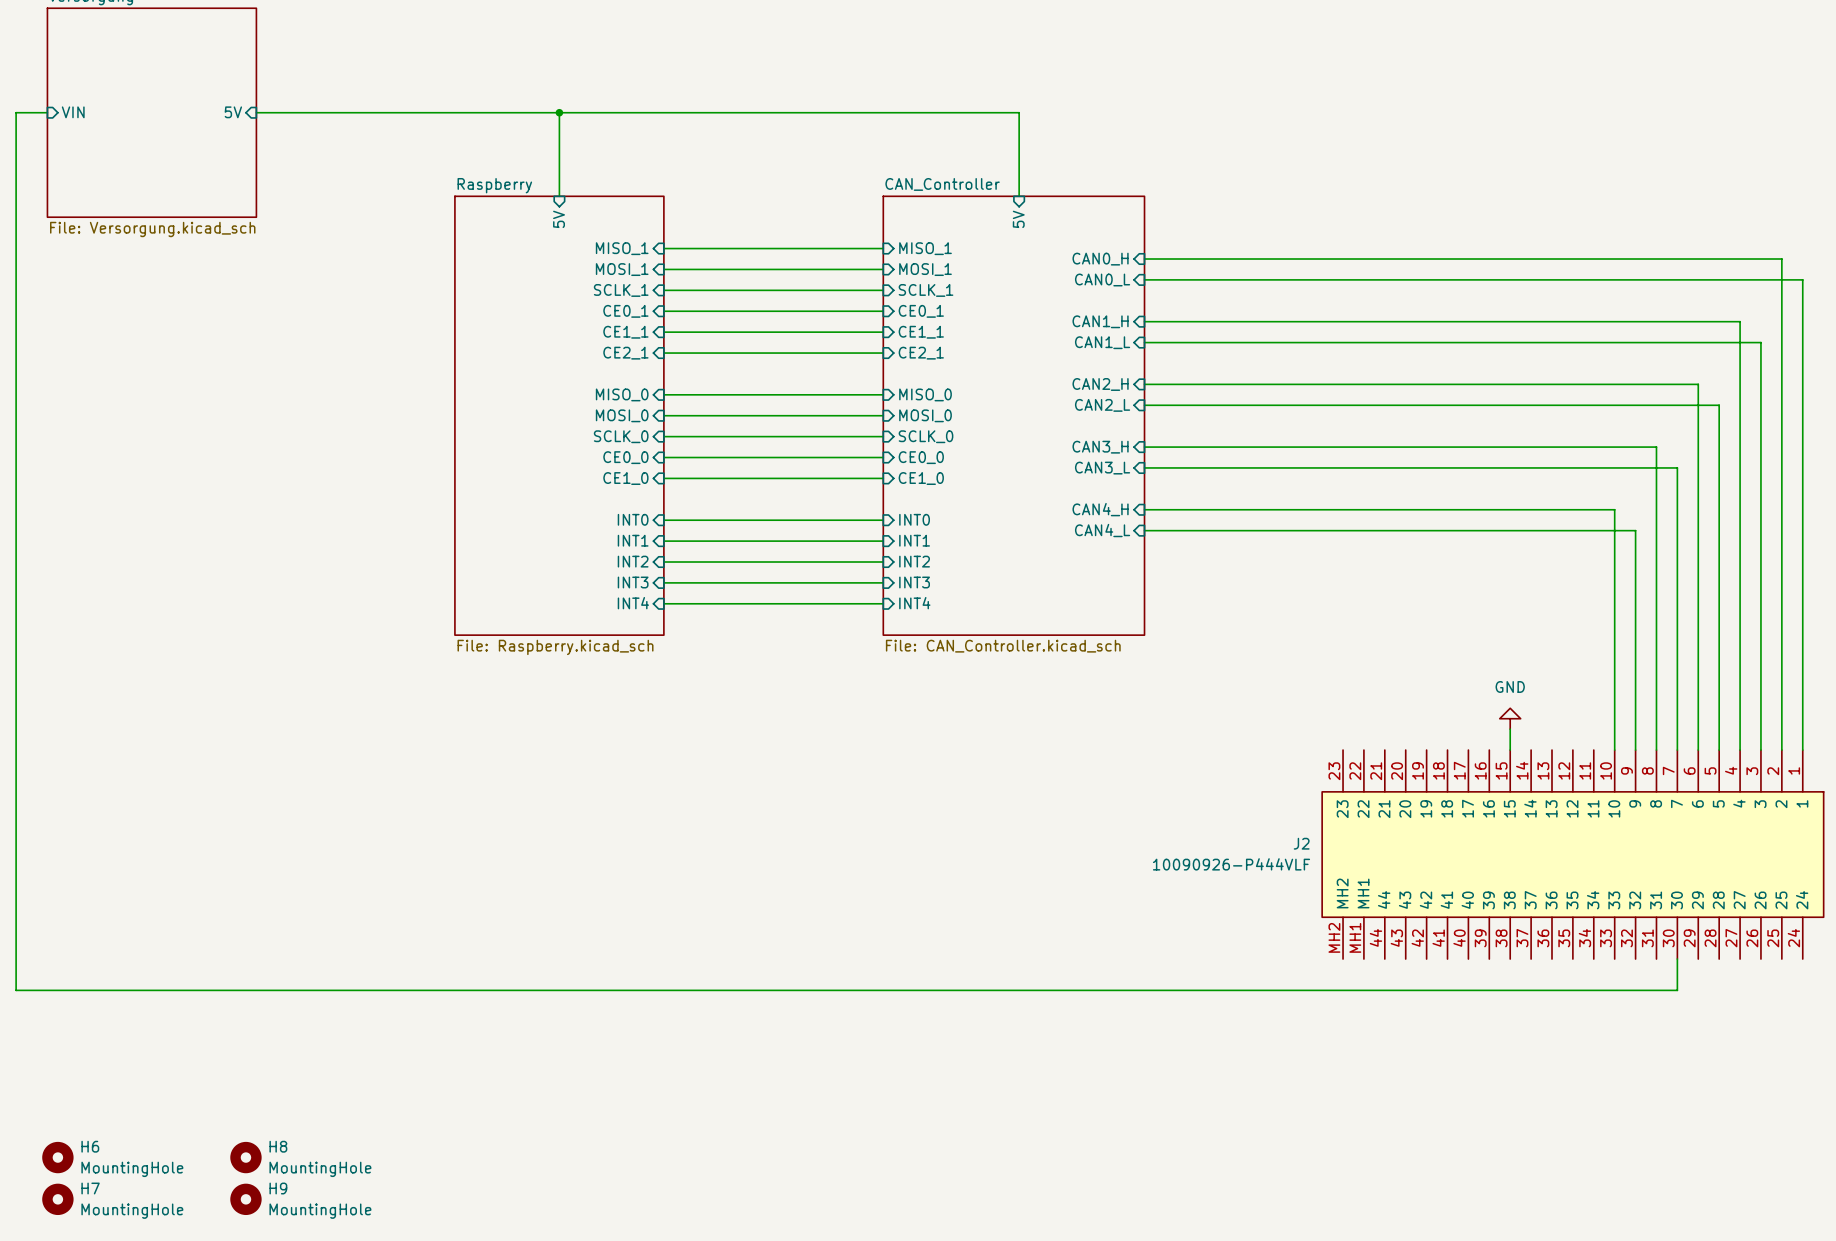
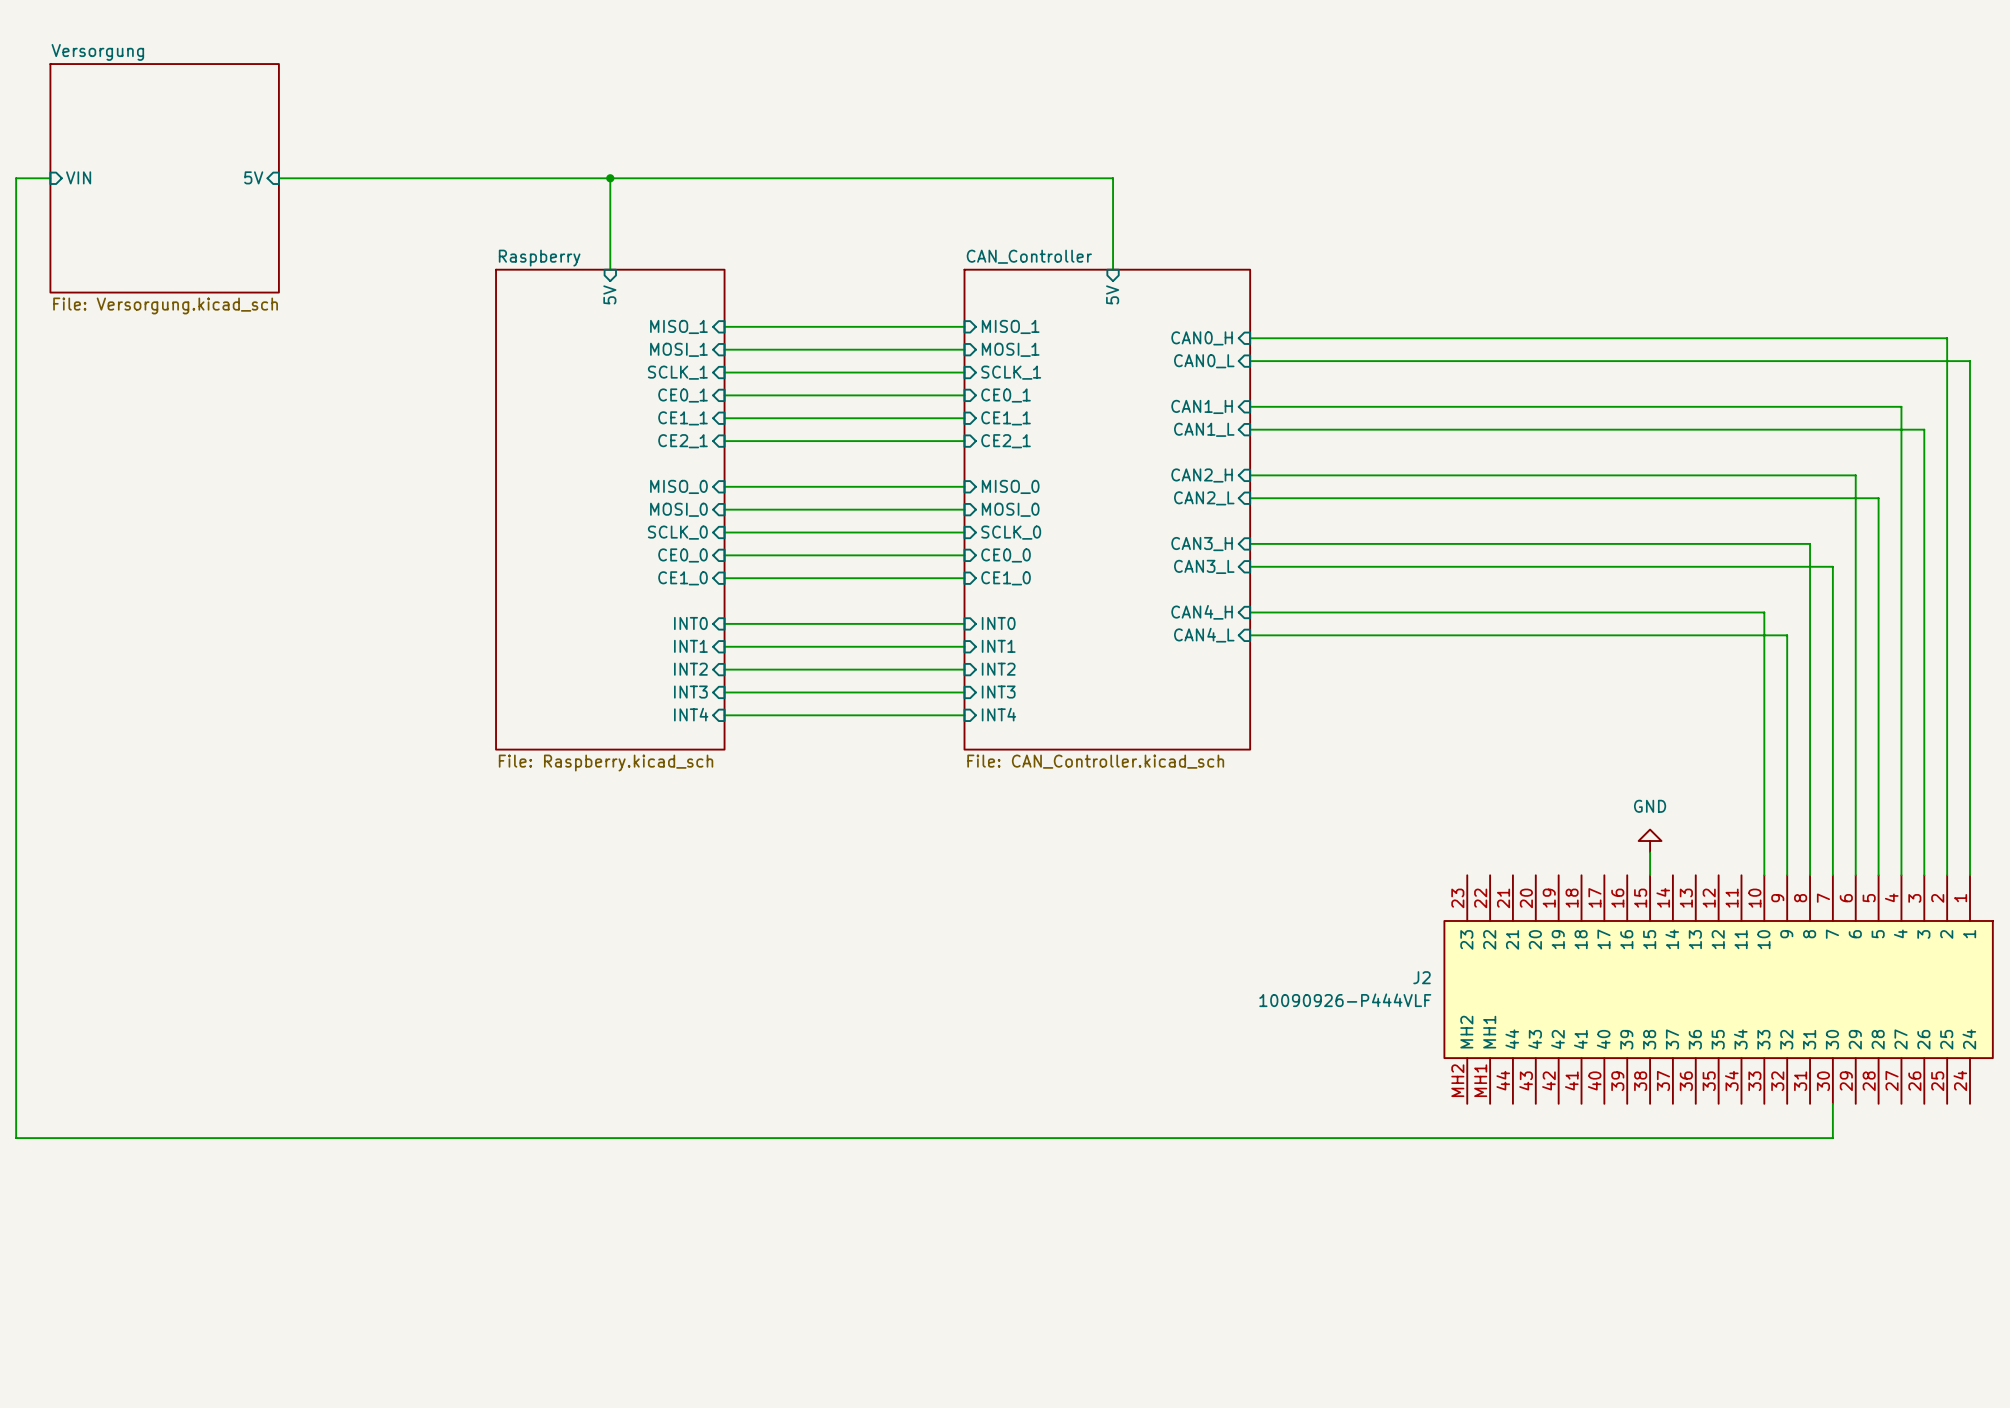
H6: MountingHole (57, 1157) -> none
H8: MountingHole (245, 1157) -> none
H7: MountingHole (57, 1199) -> none
H9: MountingHole (245, 1199) -> none

